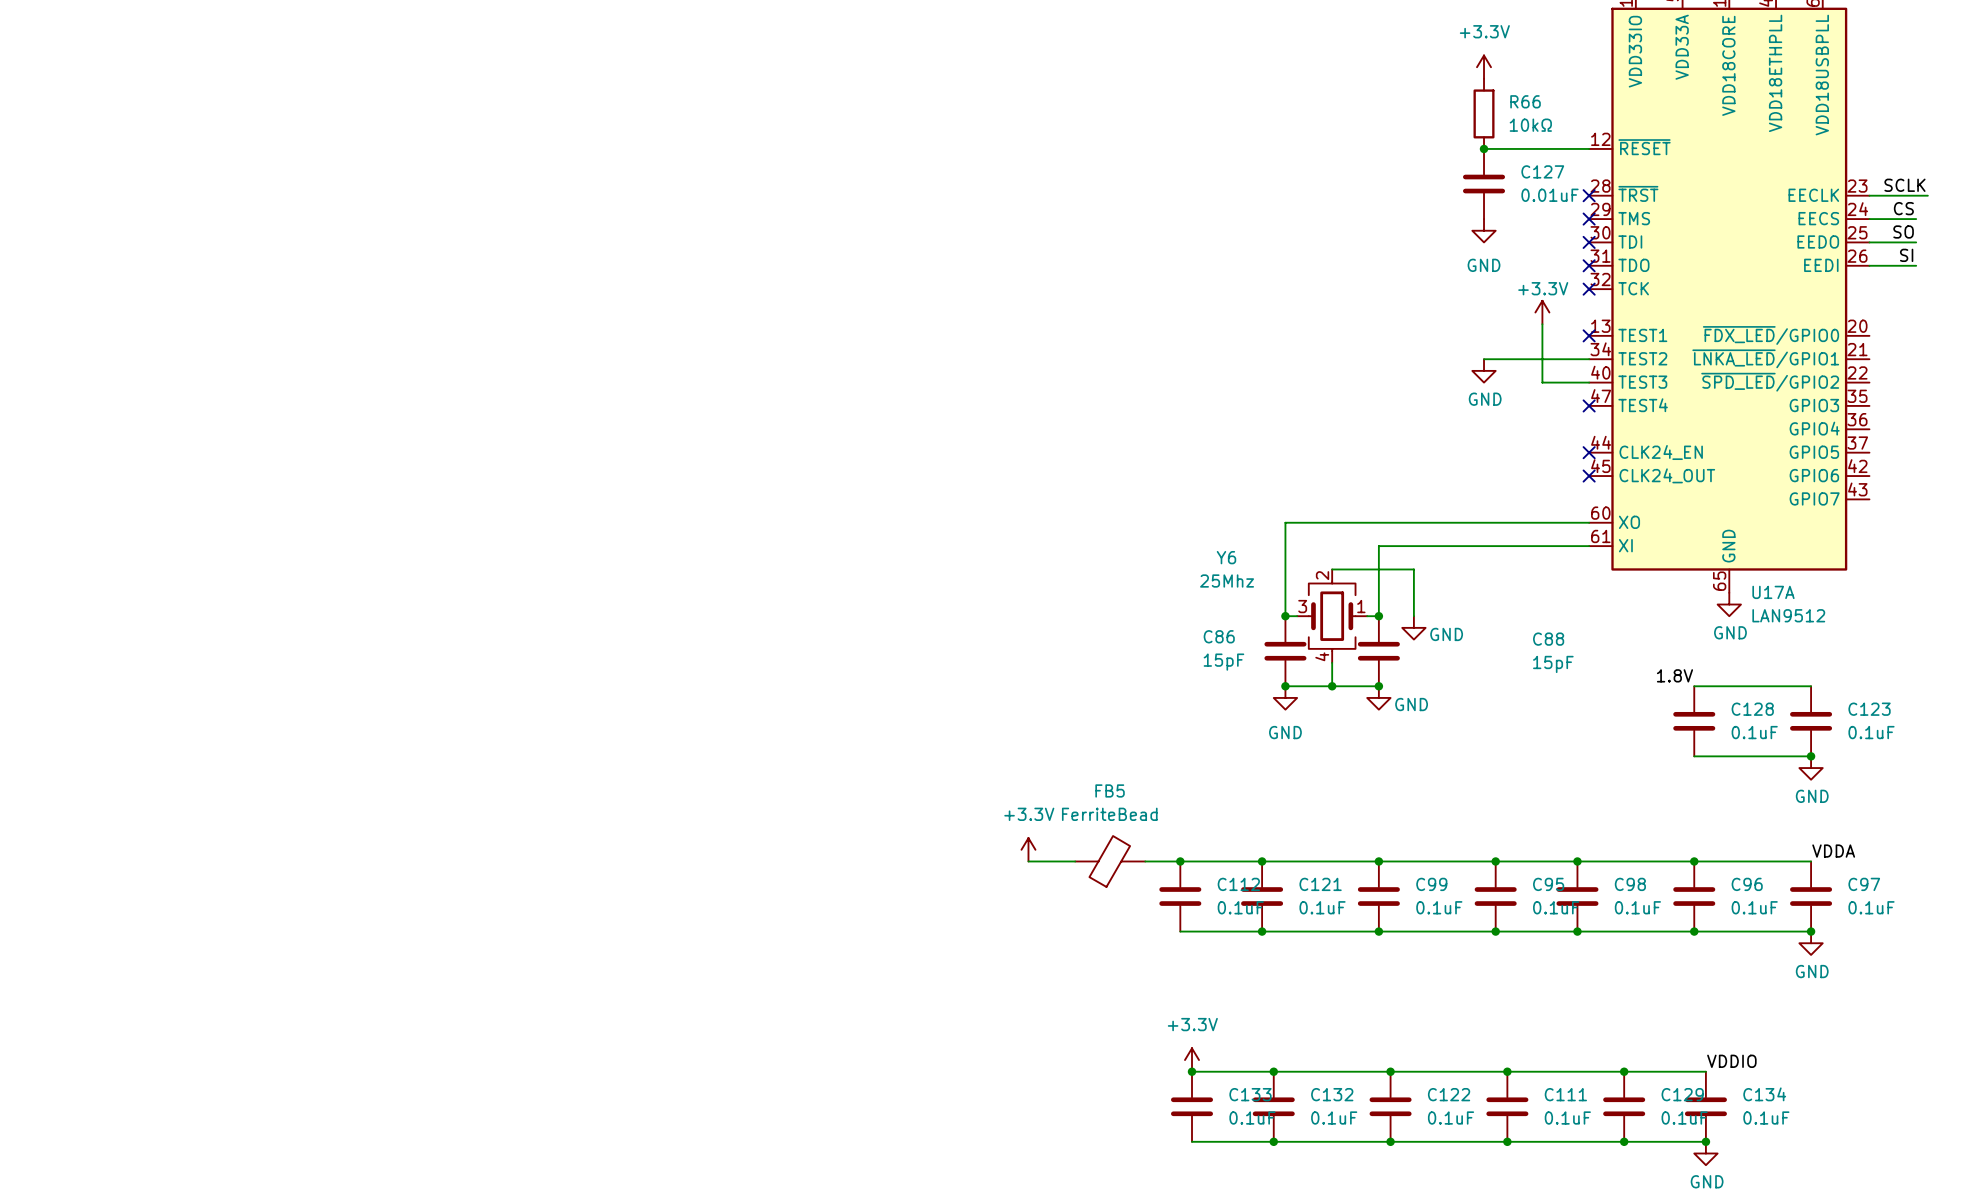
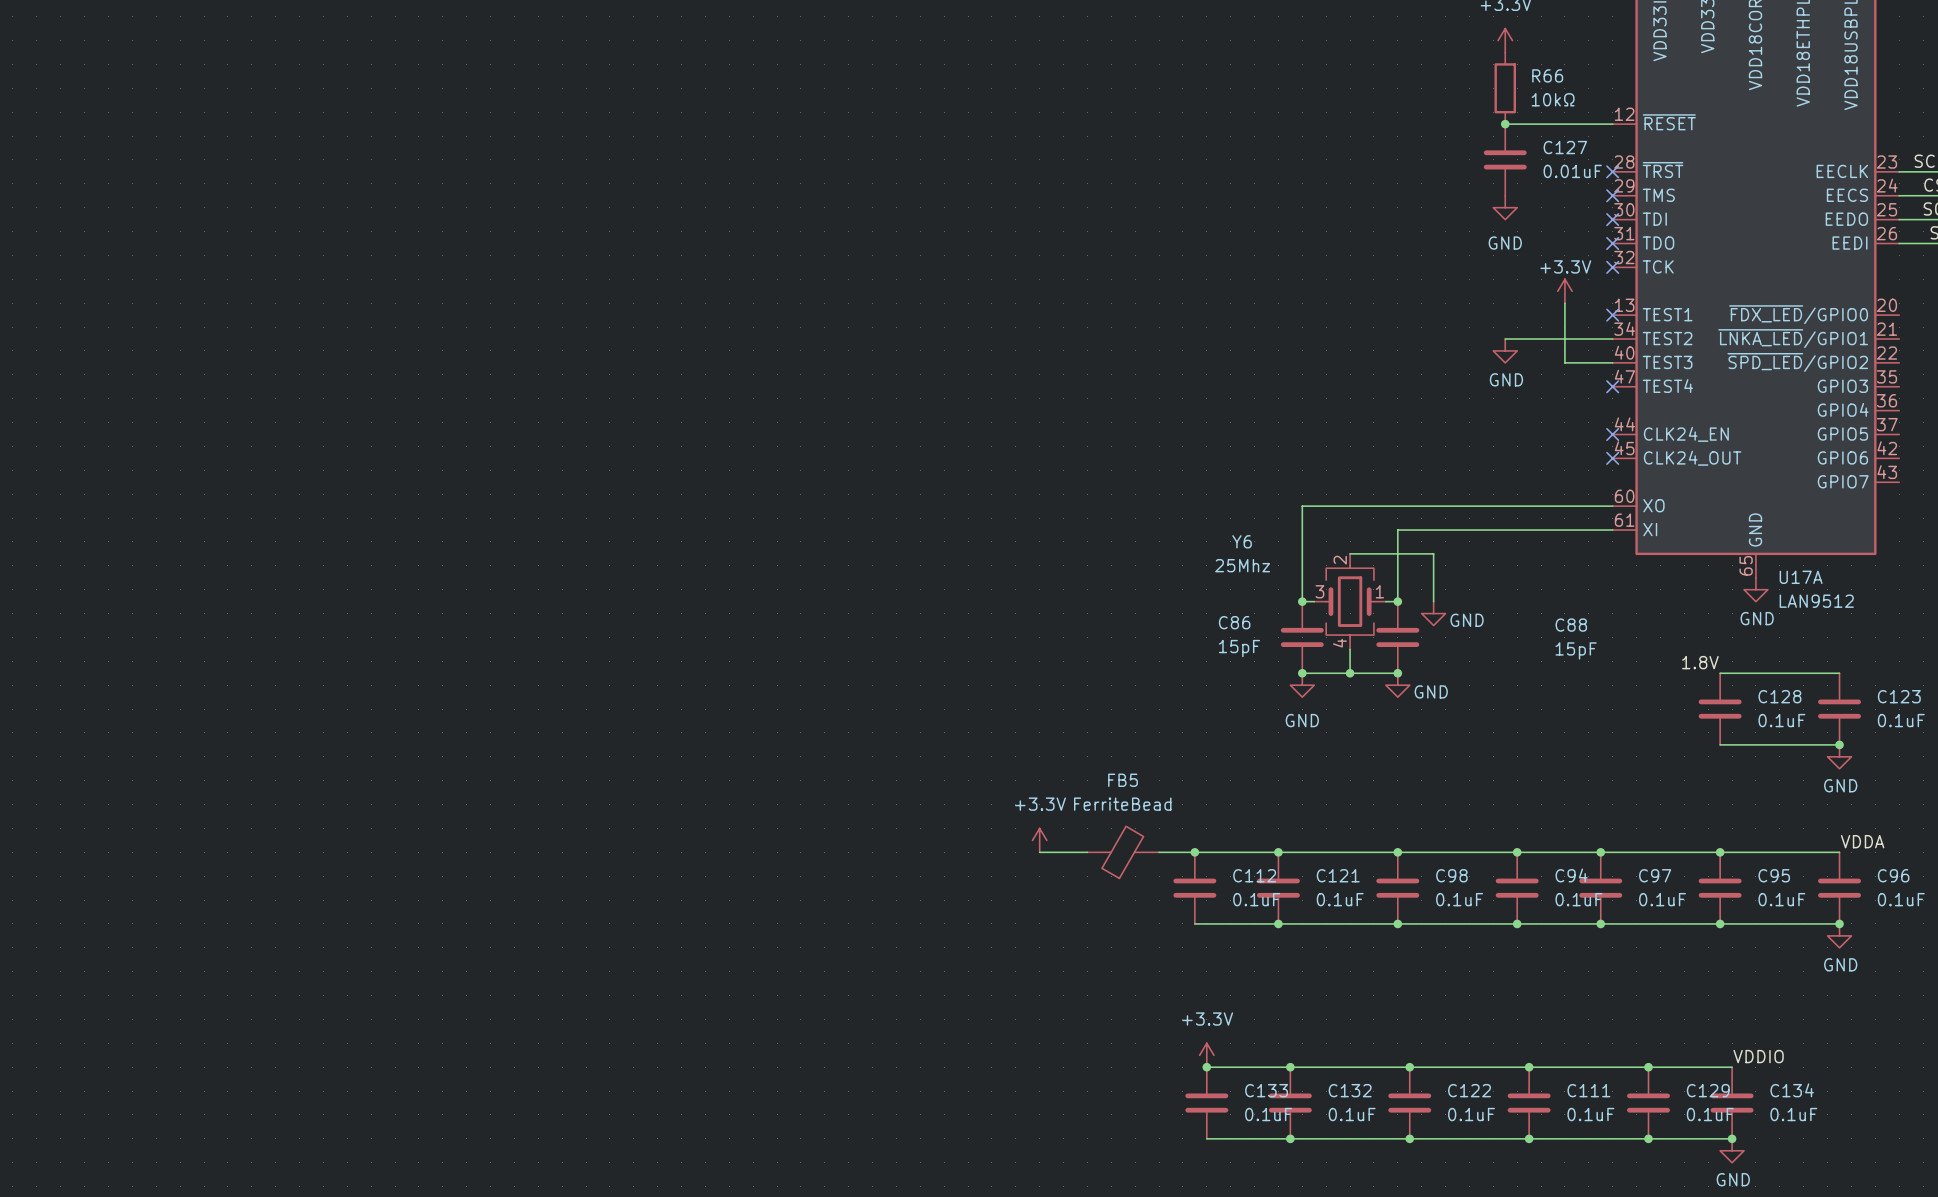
C99 name: C99 (1431, 884) -> C98 (1451, 875)
C95 name: C95 (1548, 884) -> C94 (1571, 875)
C98 name: C98 (1630, 884) -> C97 (1655, 875)
C96 name: C96 (1747, 884) -> C95 (1774, 875)
C97 name: C97 (1864, 884) -> C96 (1893, 875)

